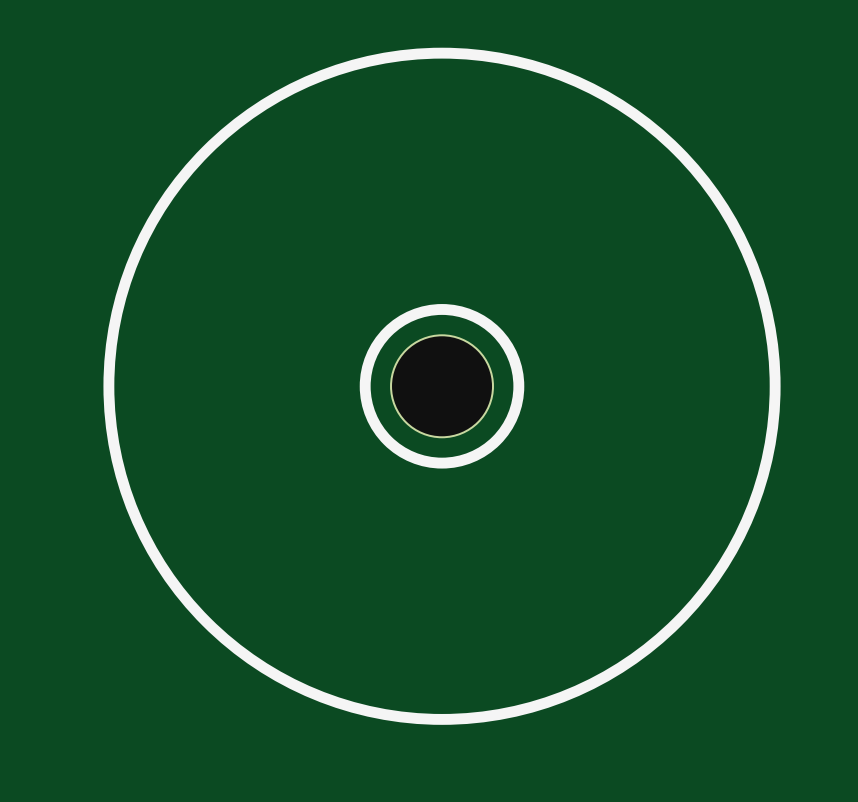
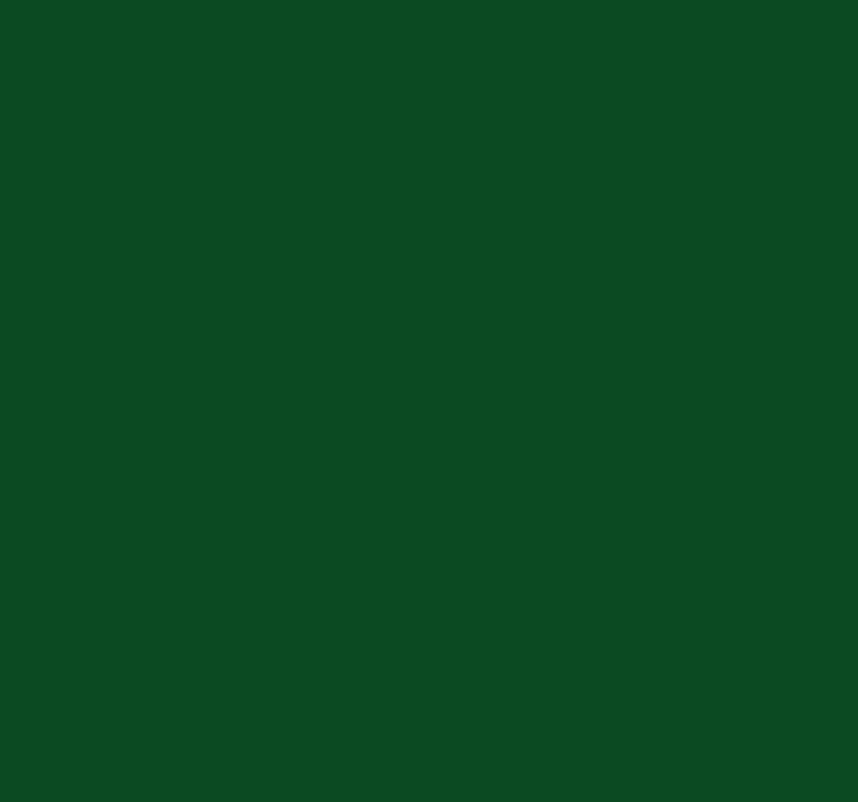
drawing: [103, 47, 781, 725] -> none
hole: (442, 386) -> none

